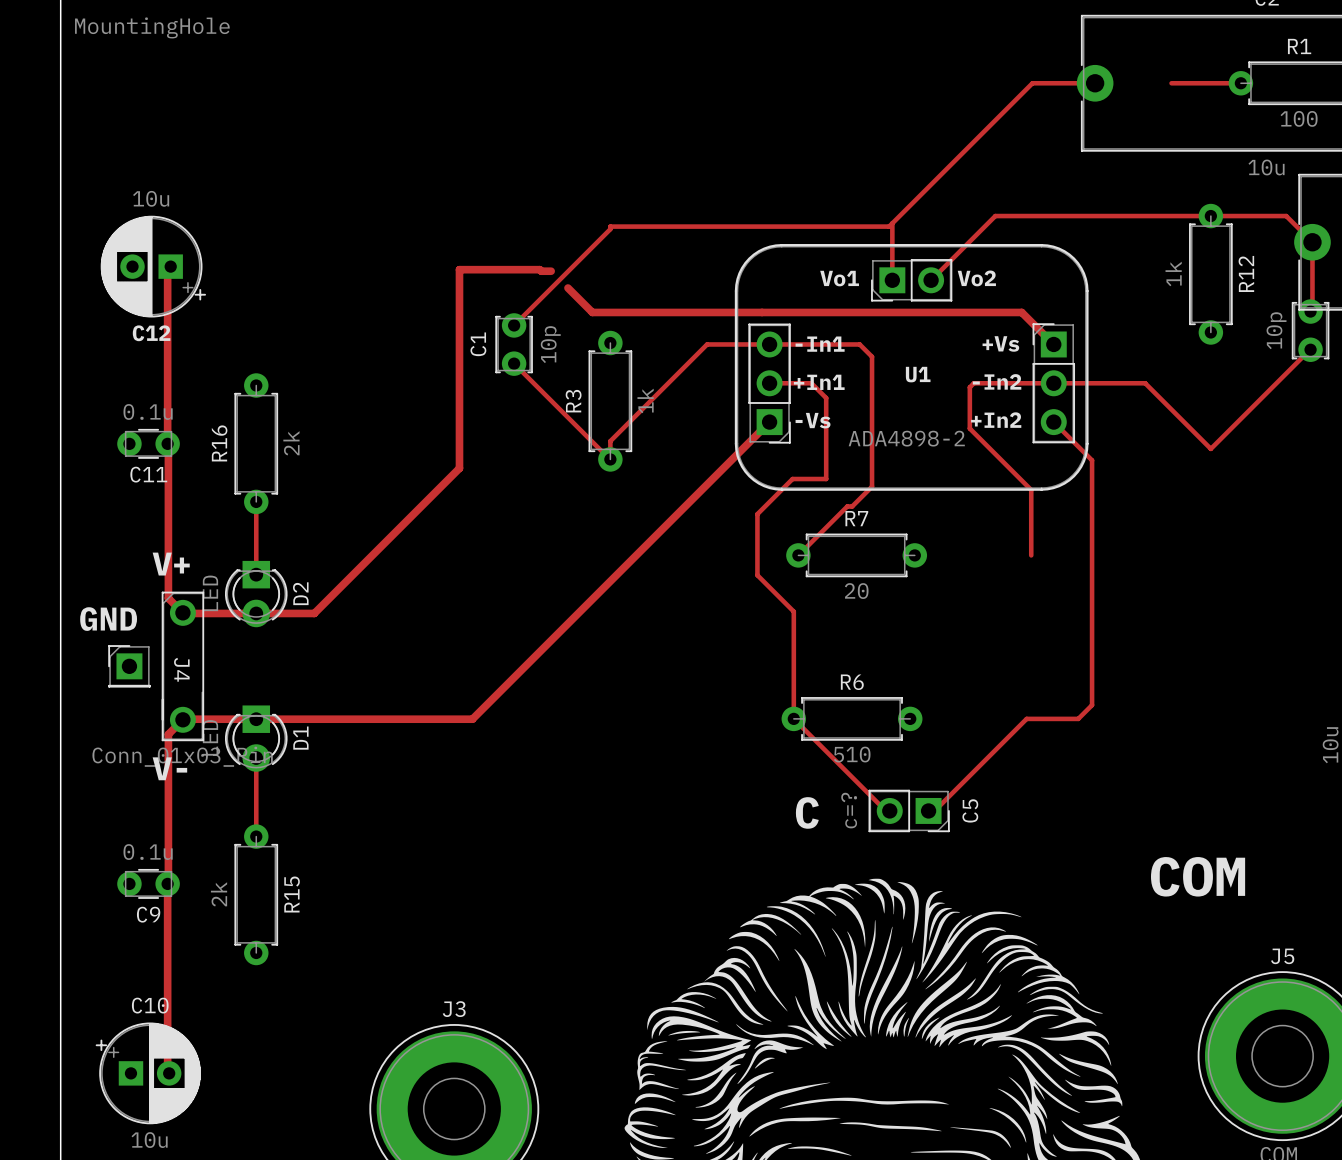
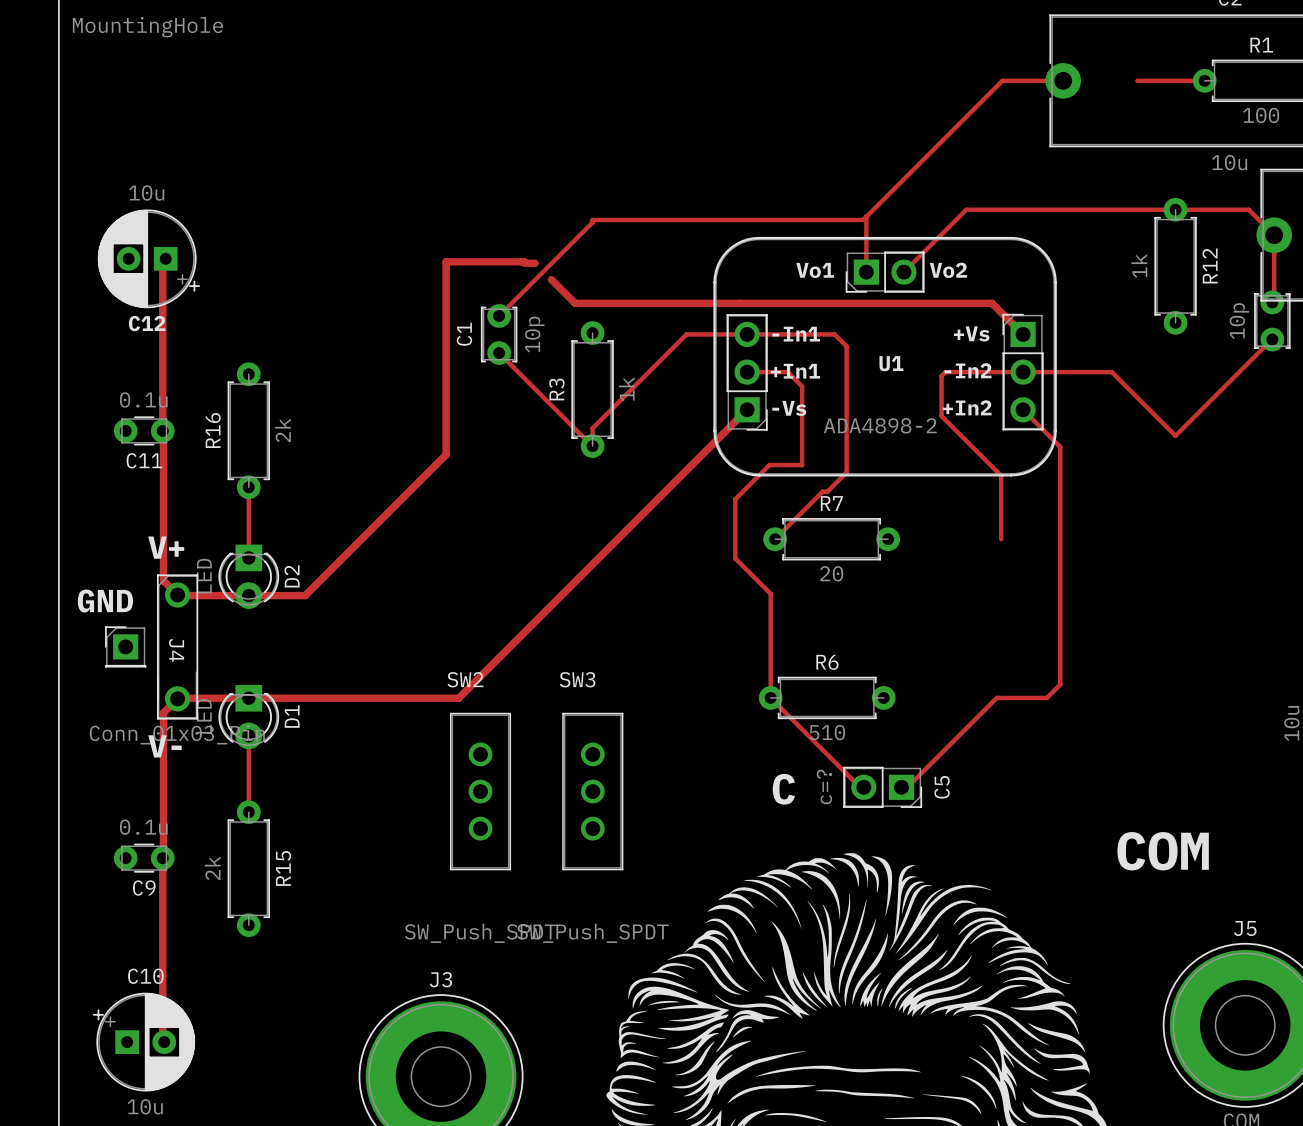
SW2: none -> SW_Push_SPDT (480, 791)
SW3: none -> SW_Push_SPDT (592, 791)

